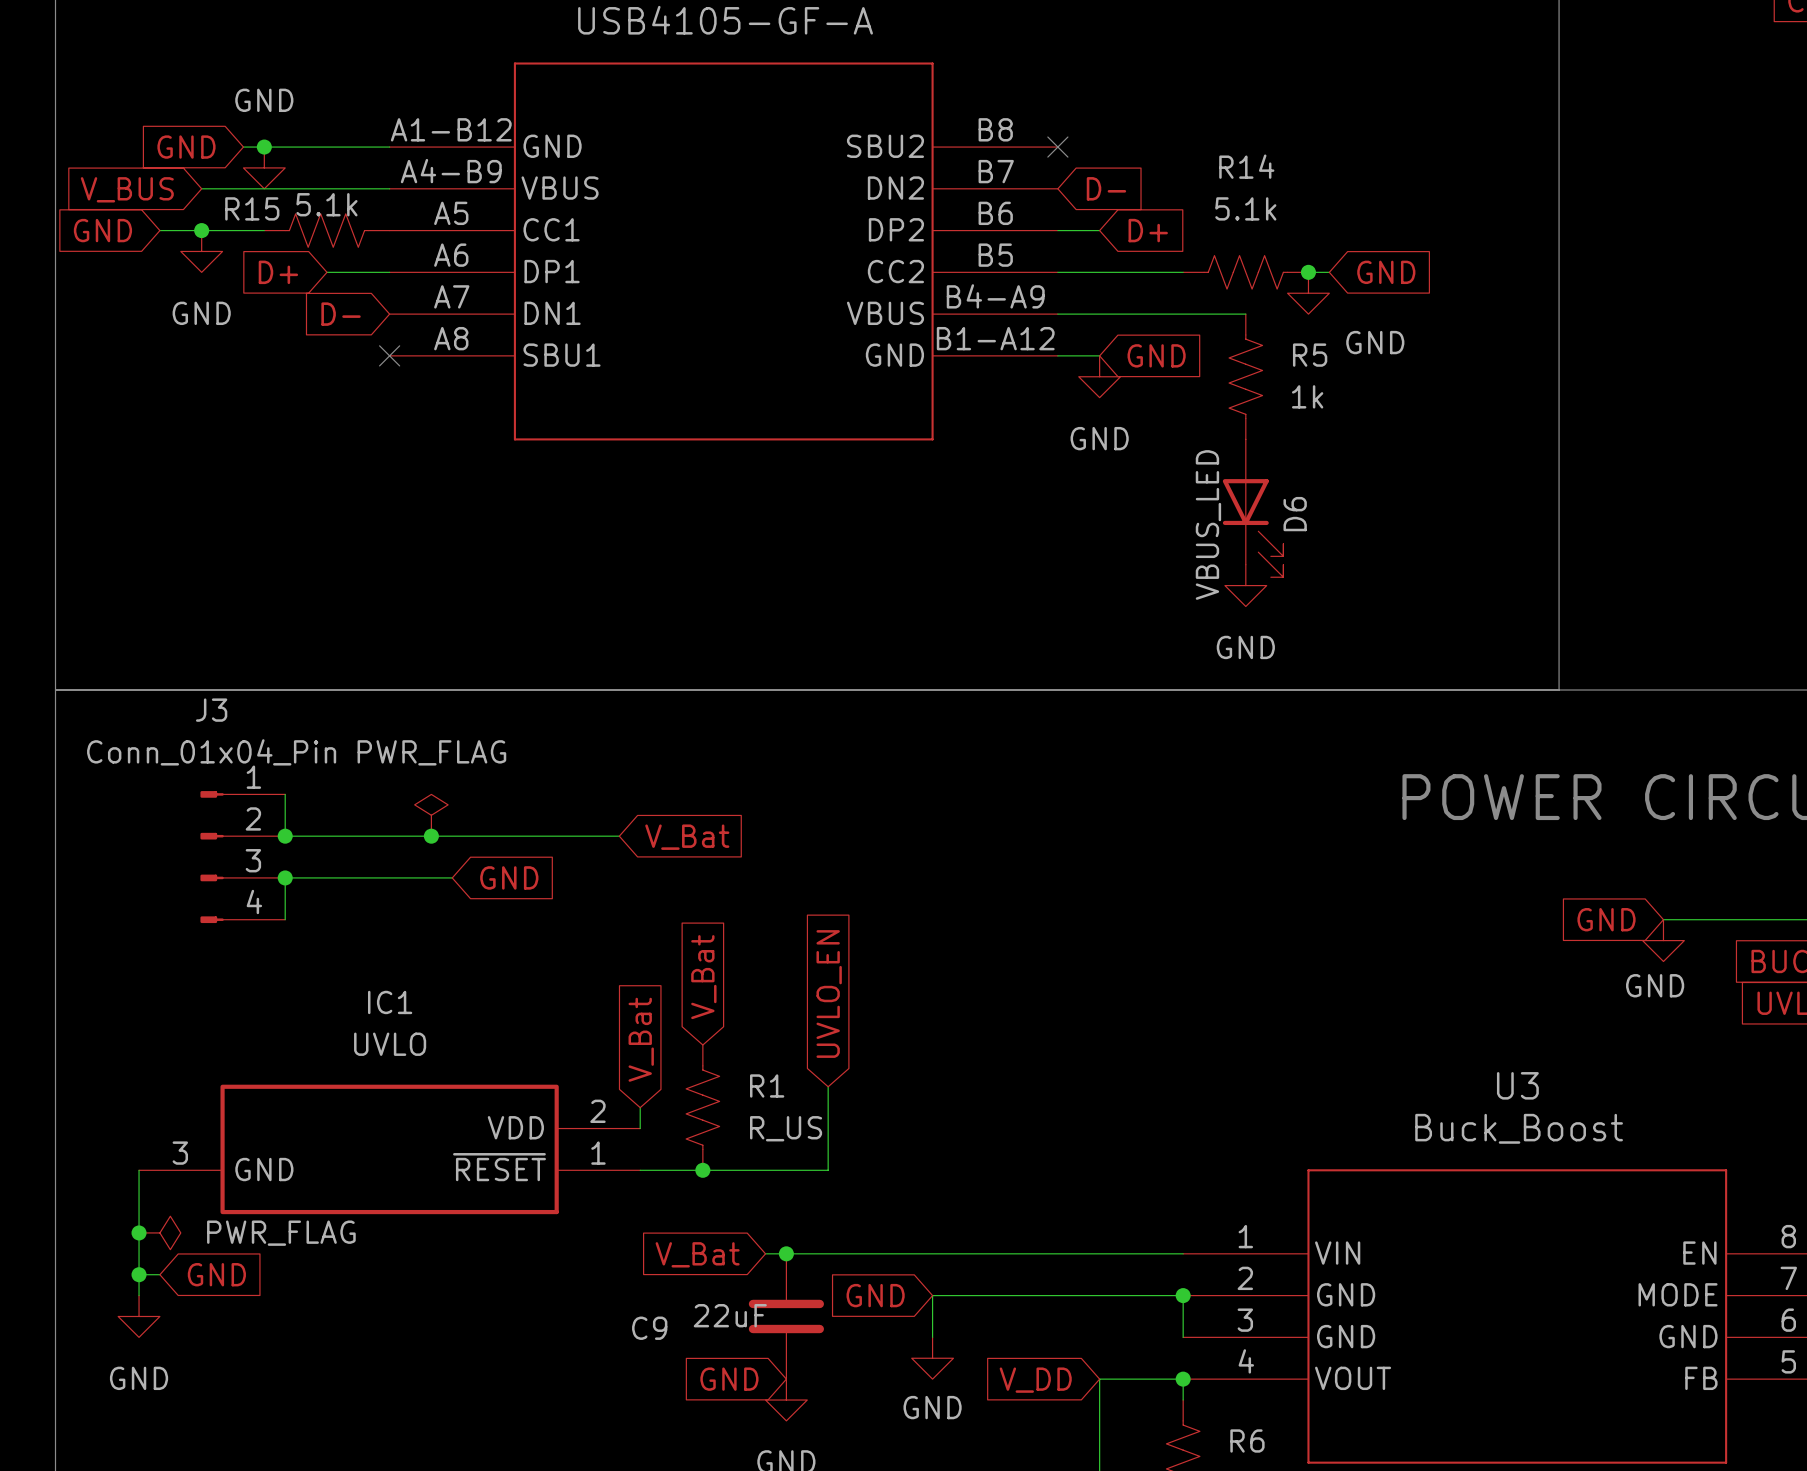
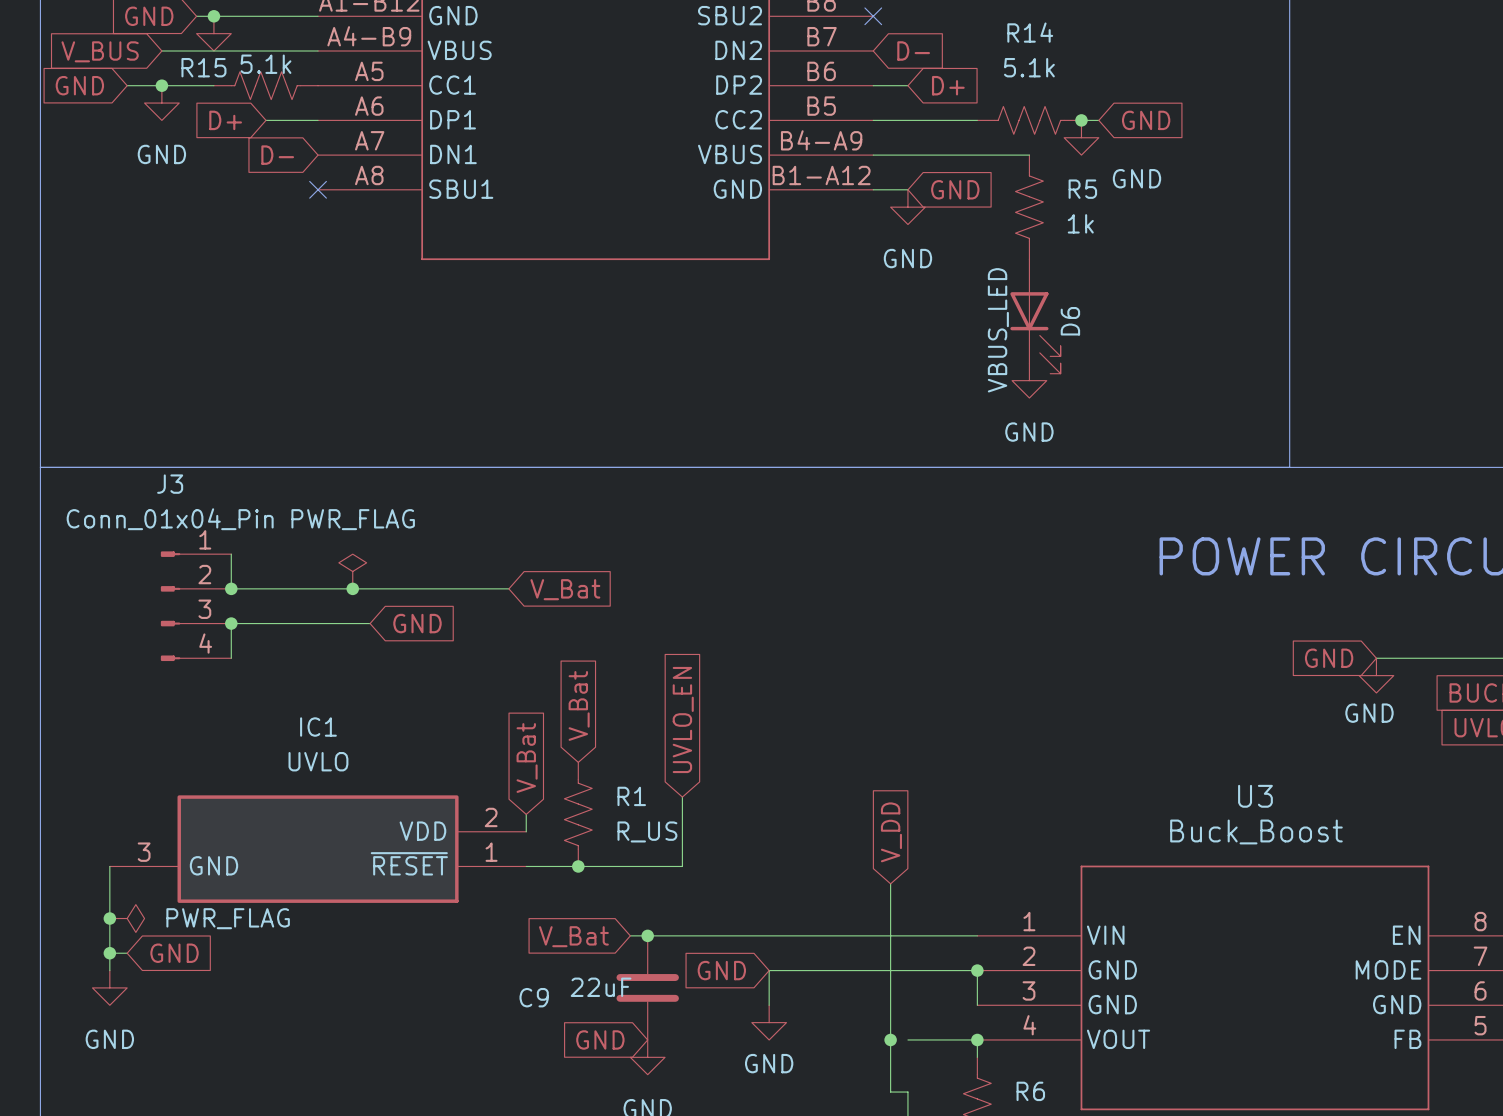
junction: none -> (890, 1039)
wire: (1099, 1379) (1099, 1441) -> (890, 883) (890, 1092) (907, 1092)
global label rotation: 0° (1035, 1380) -> 90° clockwise (891, 832)
global label position: V_DD (1035, 1380) -> V_DD (891, 832)

